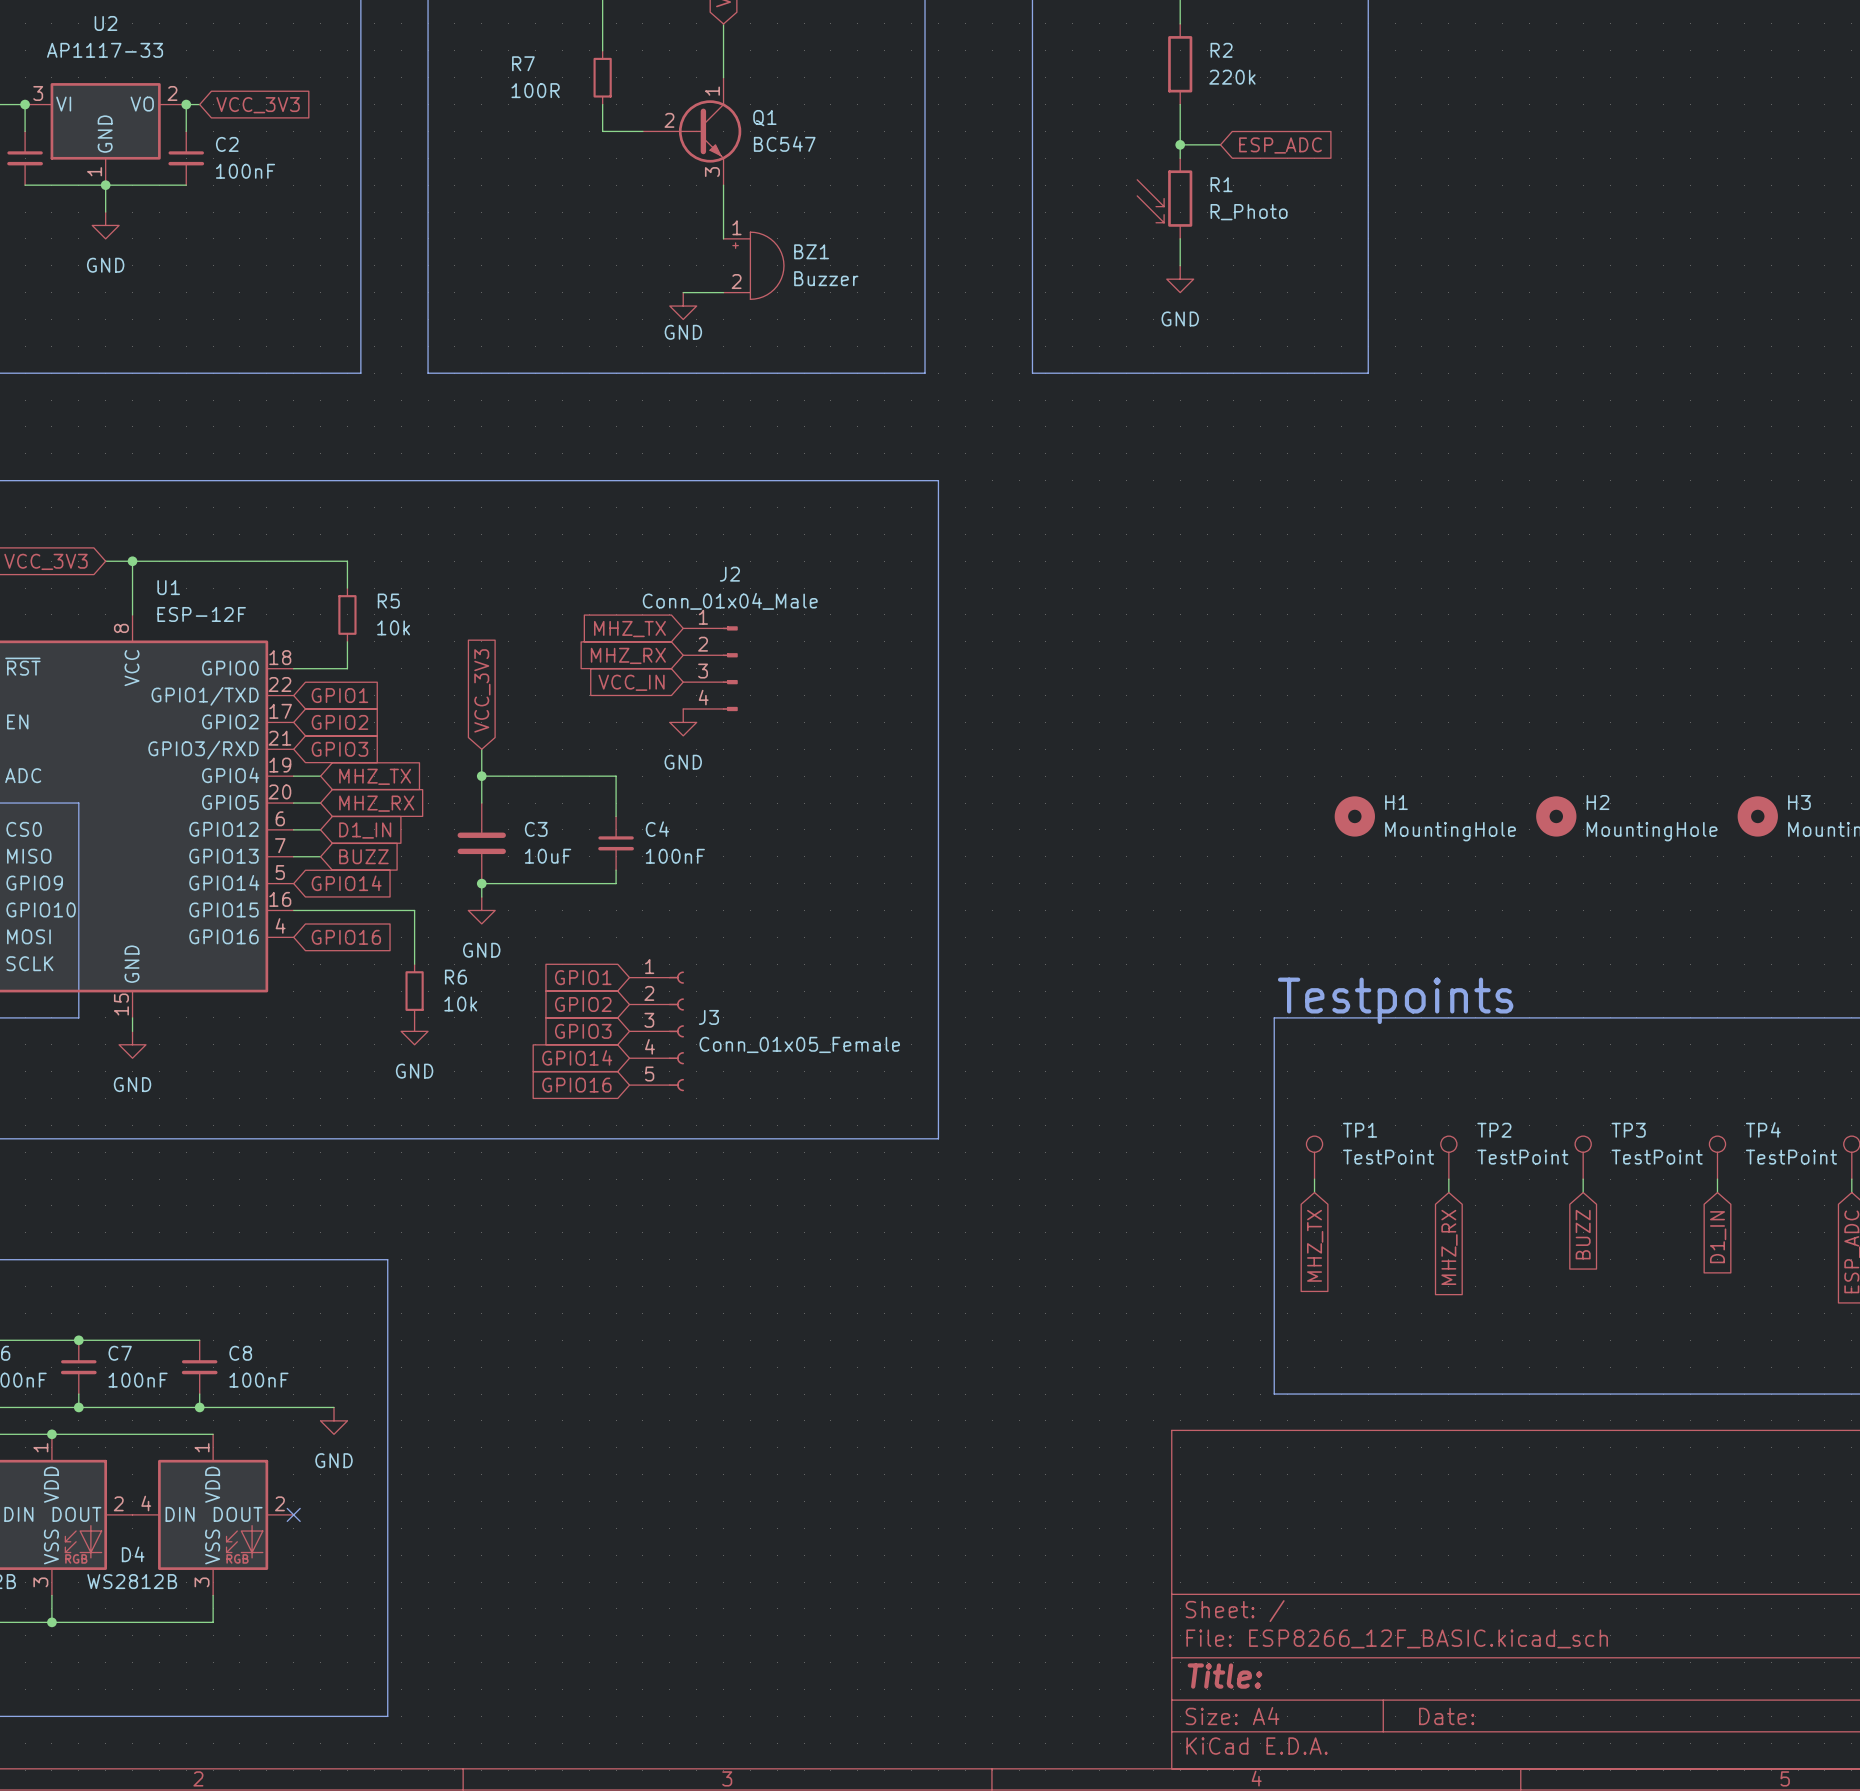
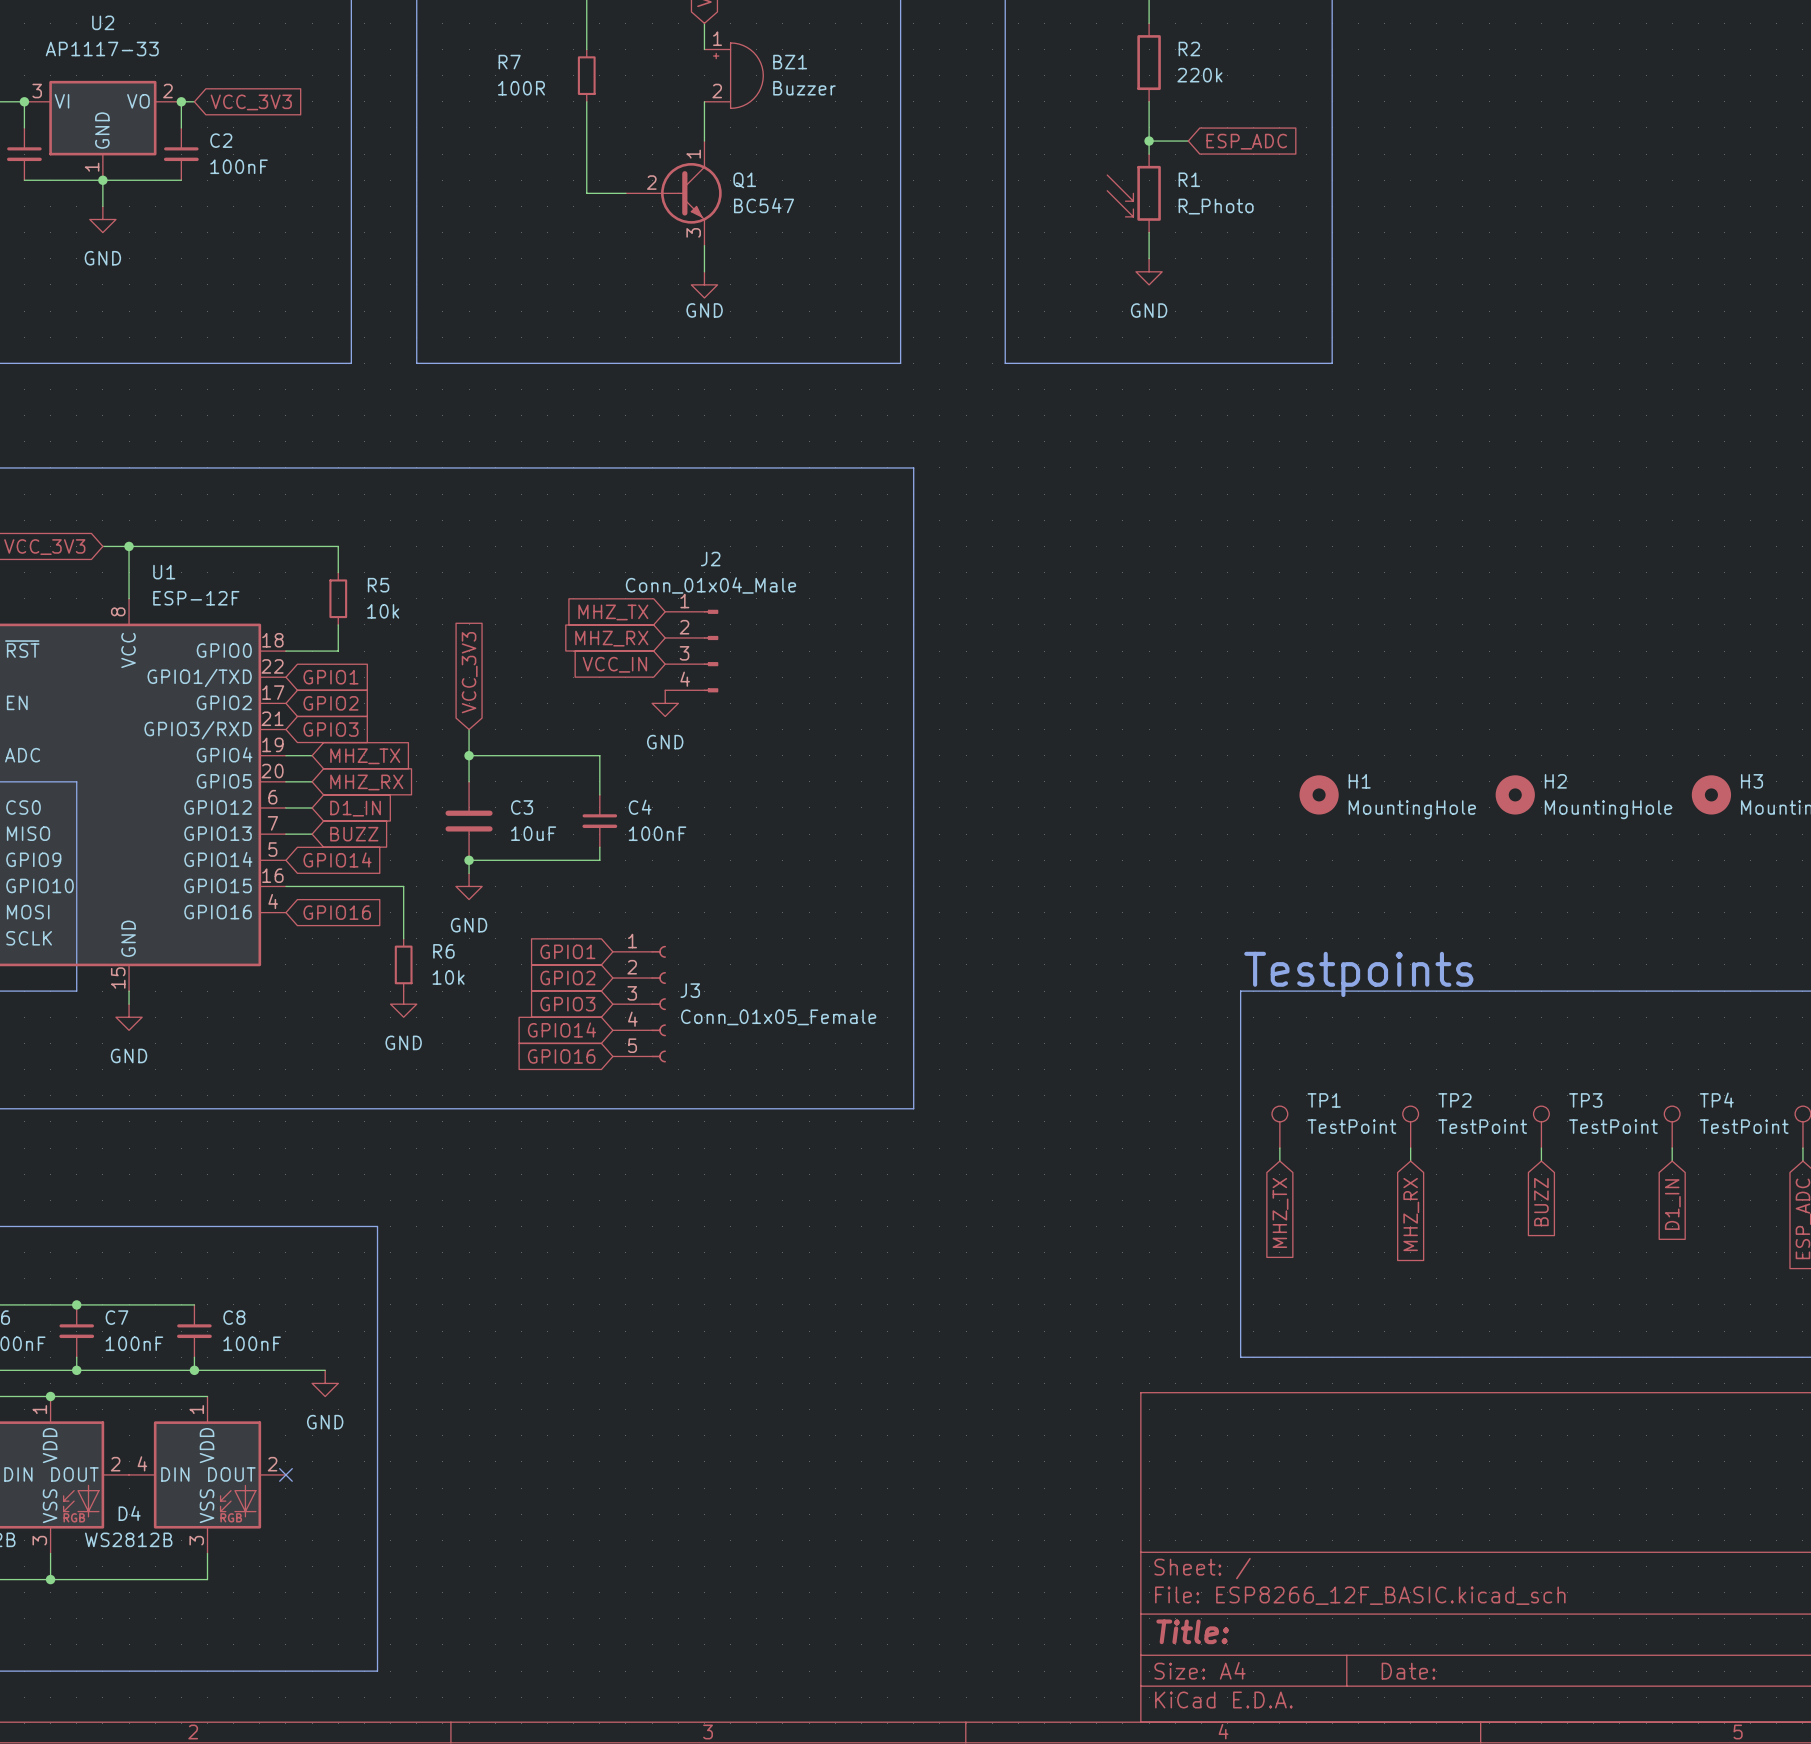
wire: (723, 50) (723, 77) -> (704, 245) (704, 271)
wire: none -> (704, 101) (704, 141)
wire: (602, 131) (642, 131) -> (586, 127) (586, 193) (625, 193)
Q1 position: (692, 131) -> (673, 193)
wire: (723, 185) (723, 238) -> none
BZ1 position: (753, 265) -> (733, 75)
wire: (683, 292) (723, 292) -> none
power symbol position: GND (683, 306) -> GND (704, 284)

